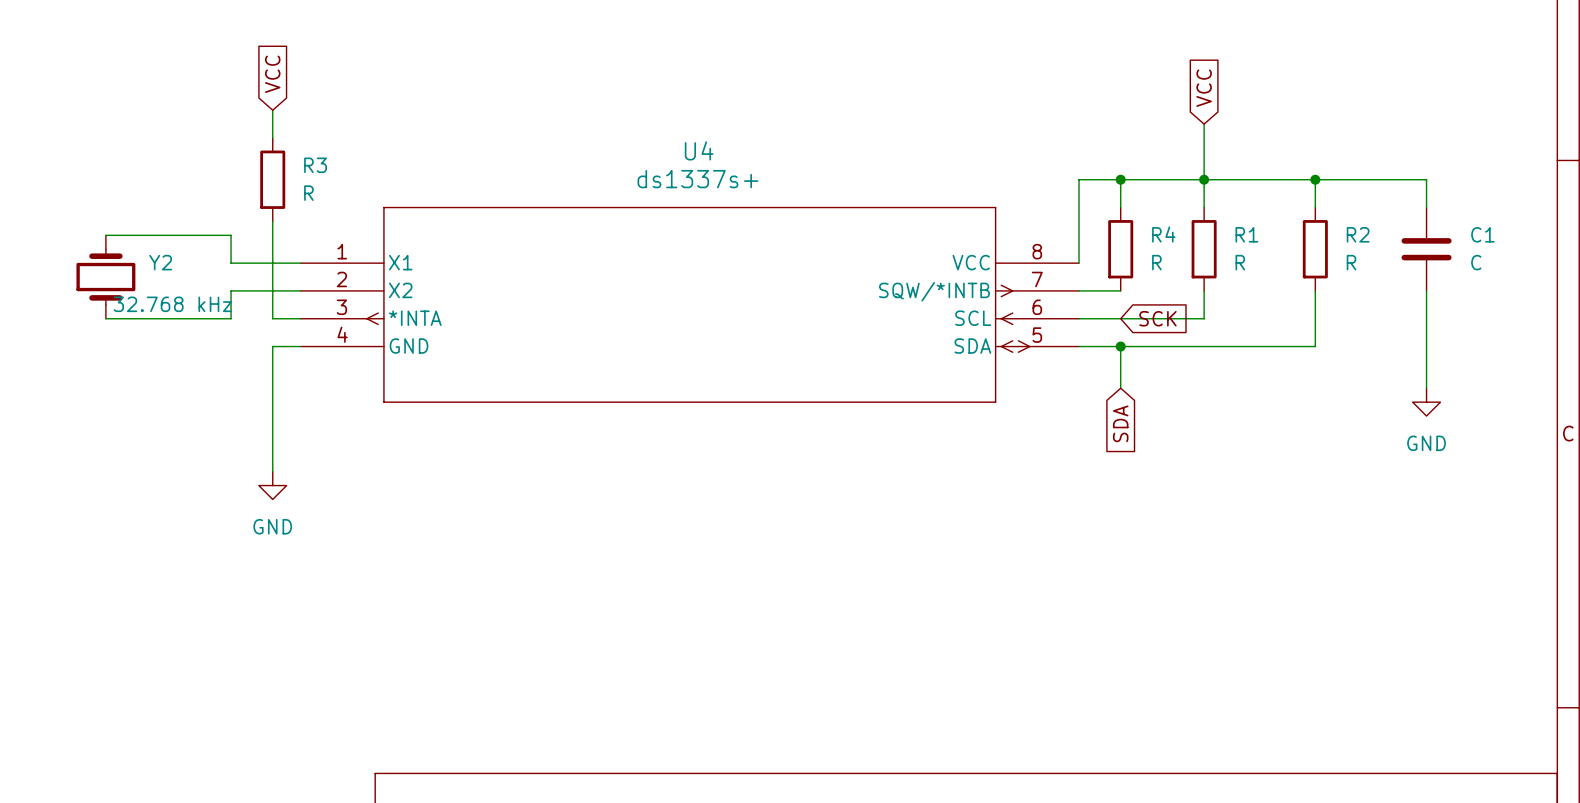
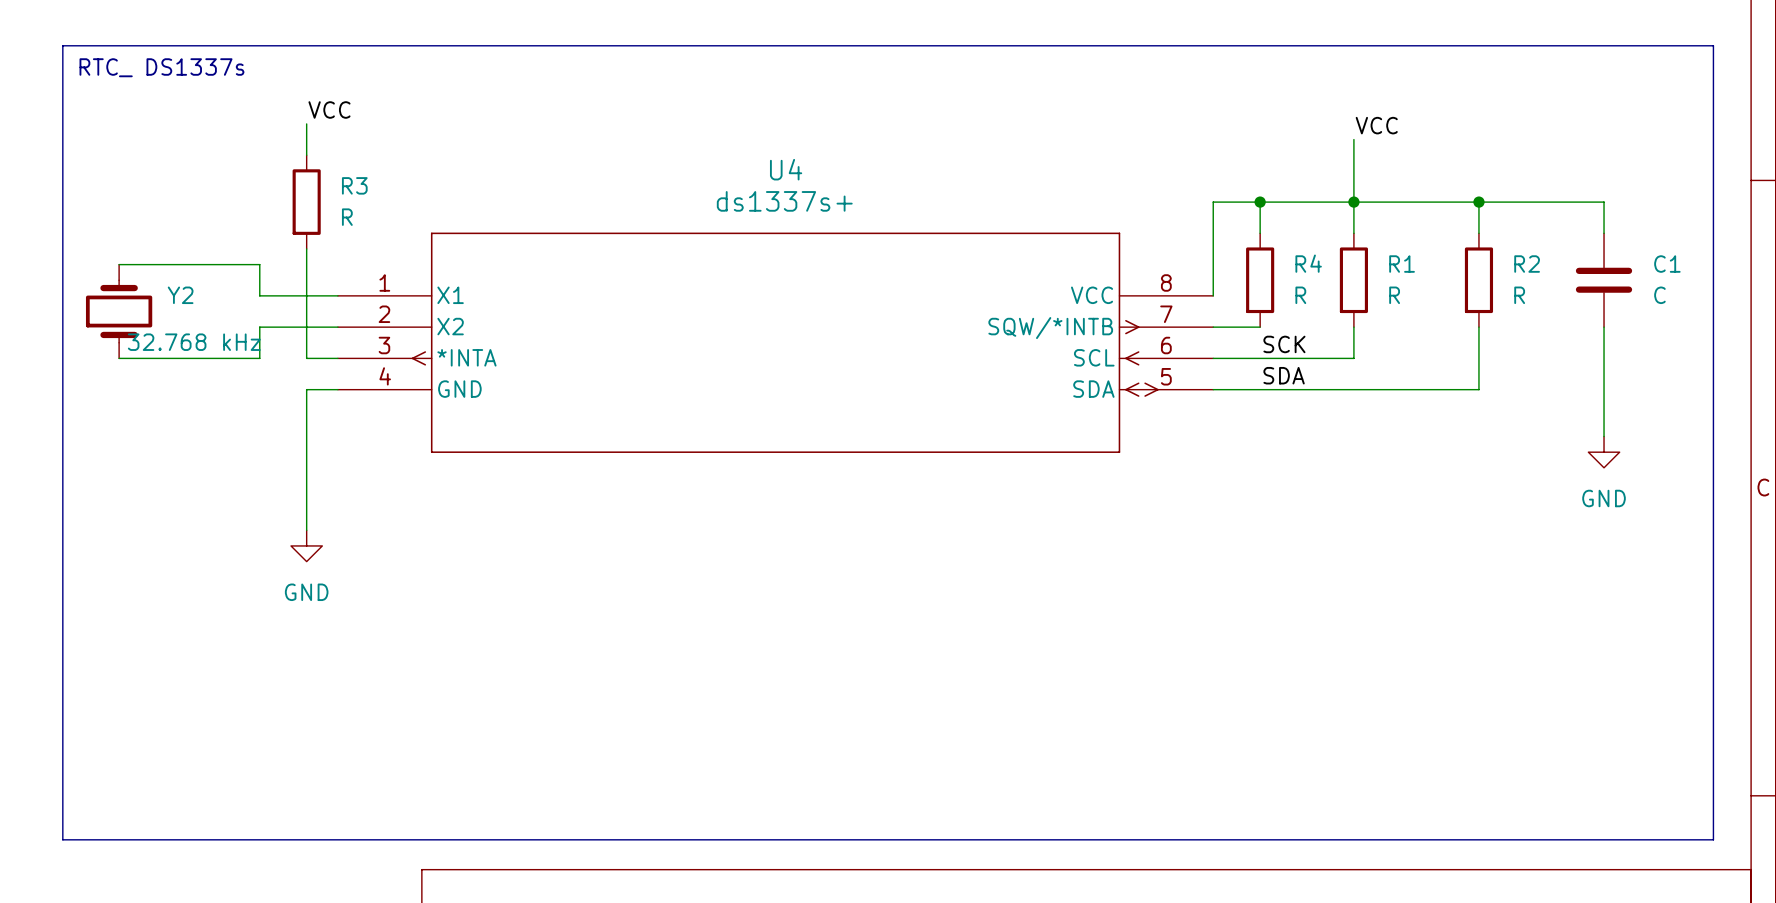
line: none -> (62, 45) (1713, 45) (1713, 839) (62, 839) (62, 45)
text: none -> RTC_ DS1337s (161, 67)
global label: VCC (272, 74) -> none
global label: VCC (1204, 88) -> none
label: none -> VCC (329, 109)
label: none -> VCC (1376, 125)
label: none -> SCK (1284, 344)
global label: SCK (1157, 318) -> none
label: none -> SDA (1284, 375)
wire: (1120, 346) (1120, 388) -> none
junction: (1120, 346) -> none
global label: SDA (1120, 423) -> none

